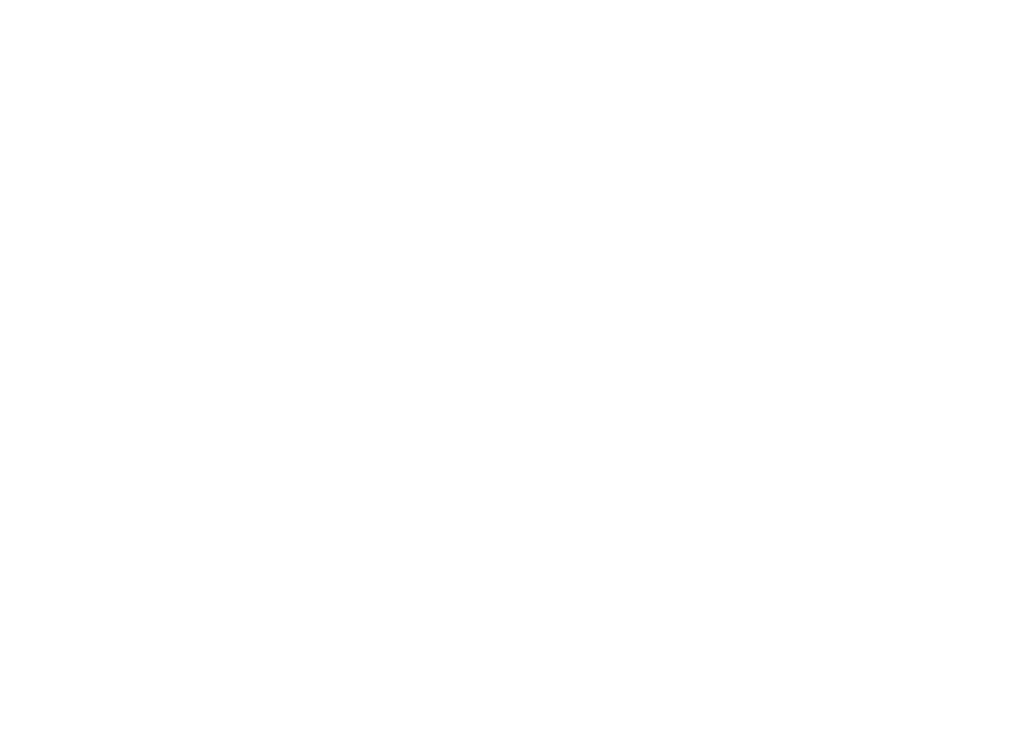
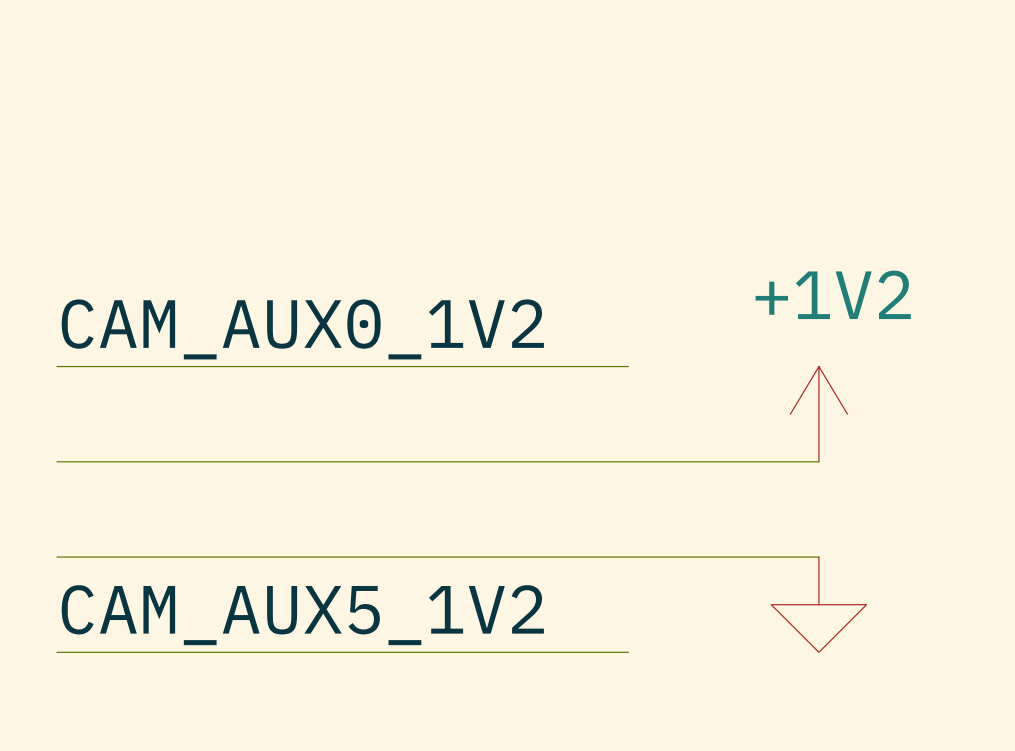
label: none -> CAM_AUX0_1V2 (302, 329)
wire: none -> (56, 366) (628, 366)
power symbol: none -> +1V2 (818, 414)
wire: none -> (56, 461) (818, 461)
wire: none -> (56, 557) (818, 557)
power symbol: none -> (818, 604)
label: none -> CAM_AUX5_1V2 (302, 615)
wire: none -> (56, 652) (628, 652)

